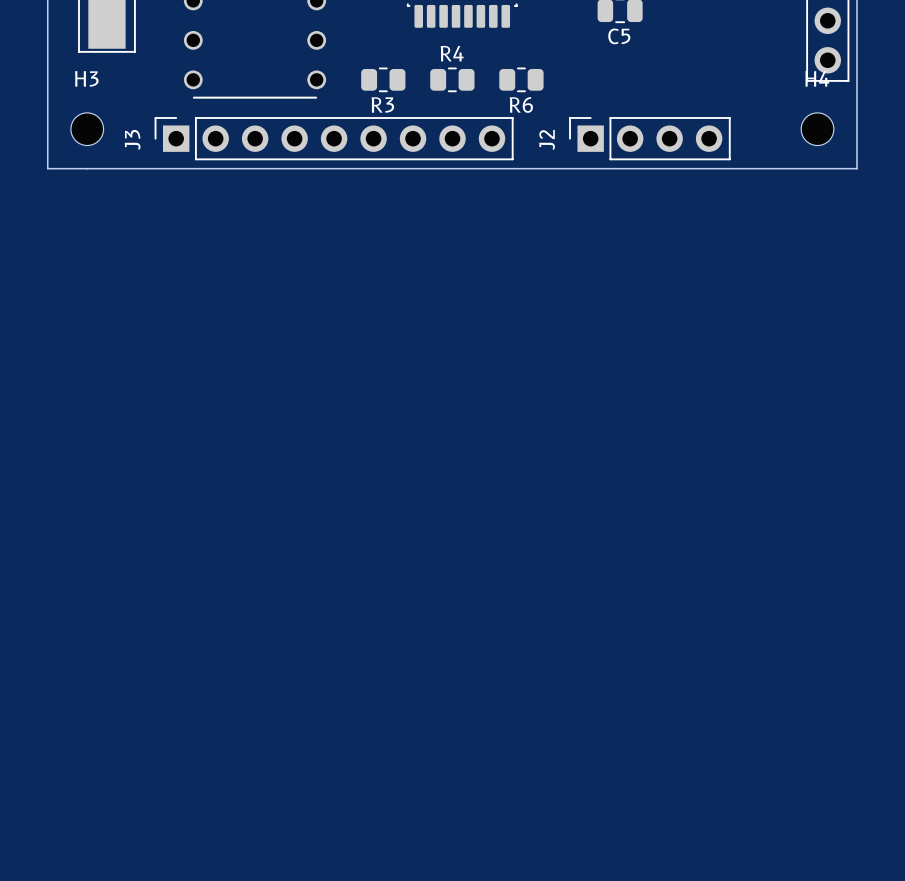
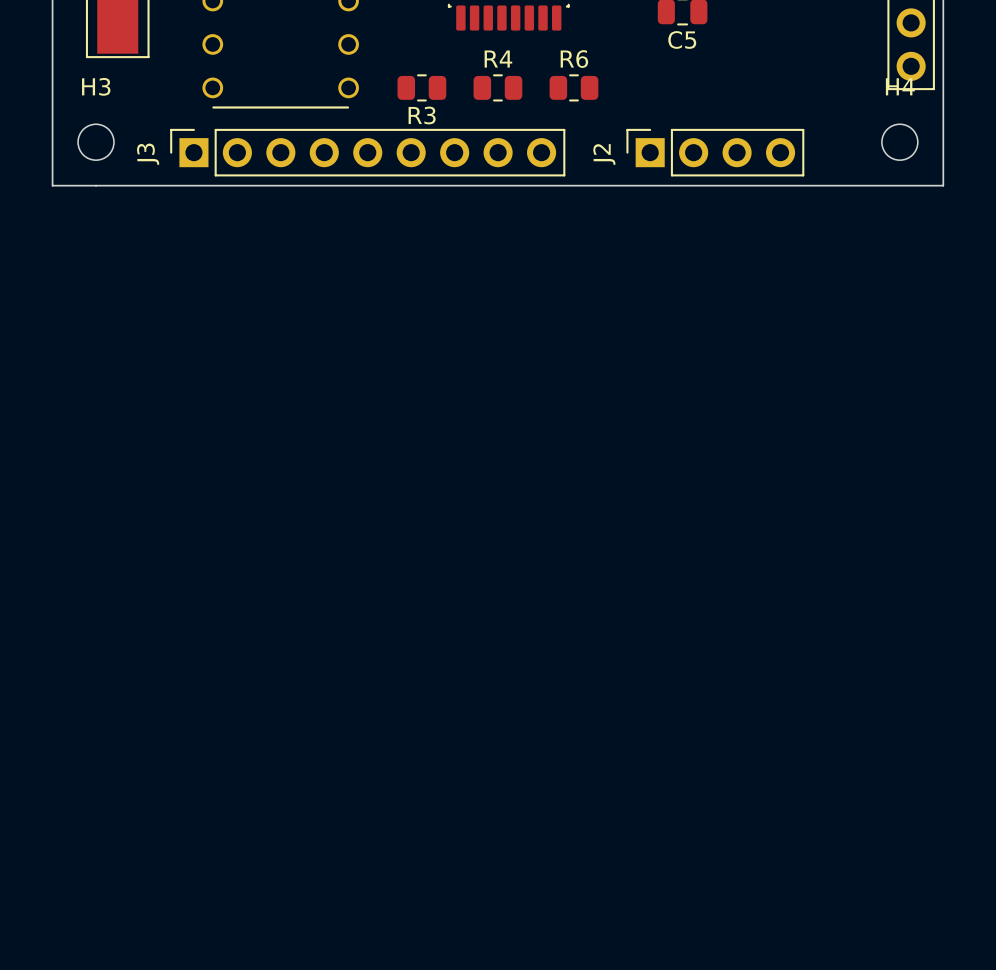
R6 name position: R6 (521, 105) -> R6 (574, 59)

